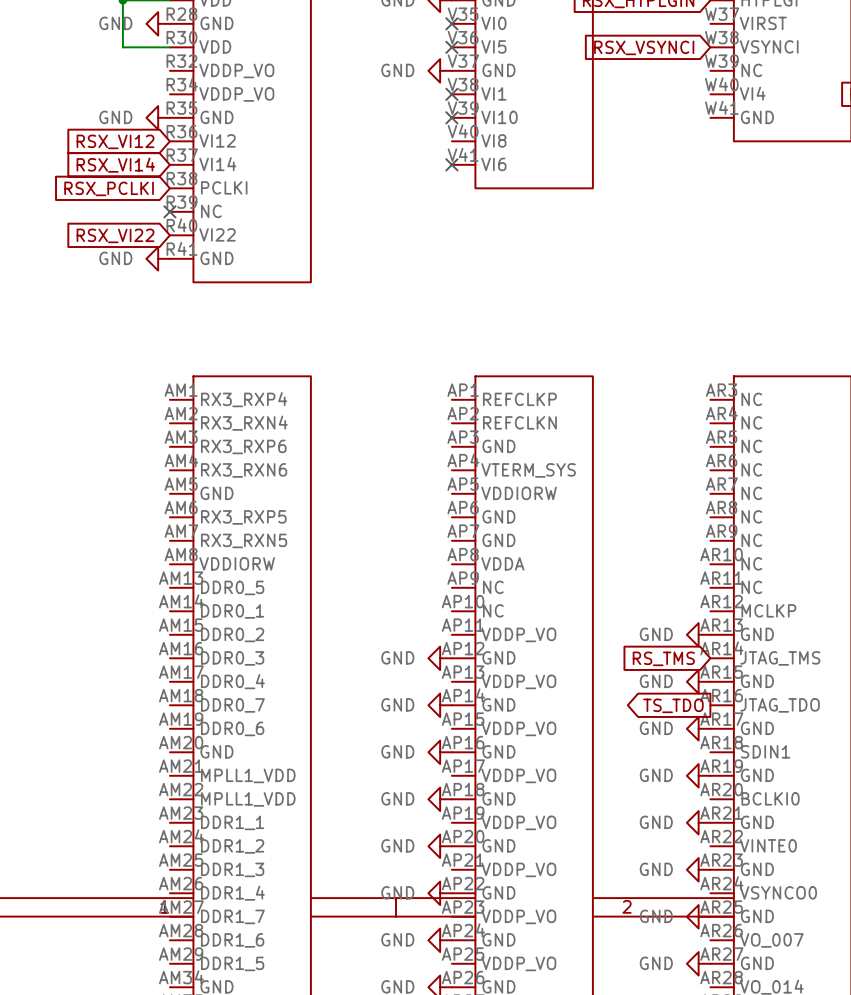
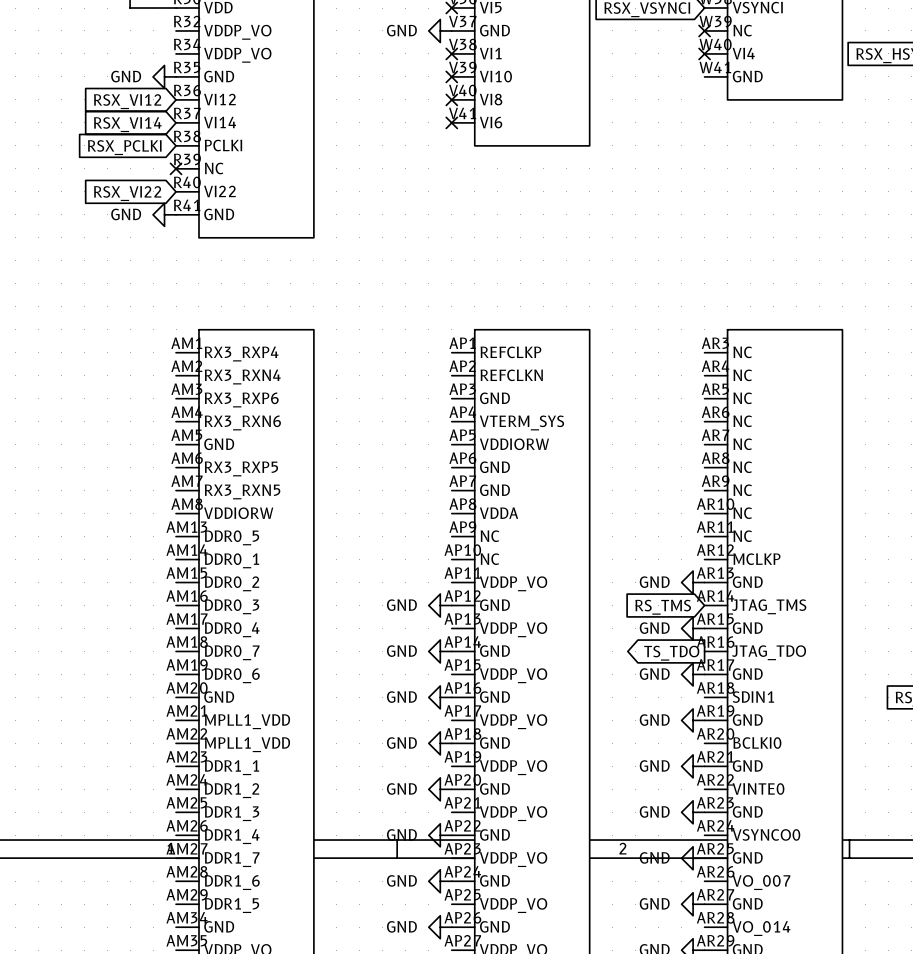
no-connect mark: none -> (704, 30)
no-connect mark: none -> (704, 53)
no-connect mark: none -> (451, 99)

